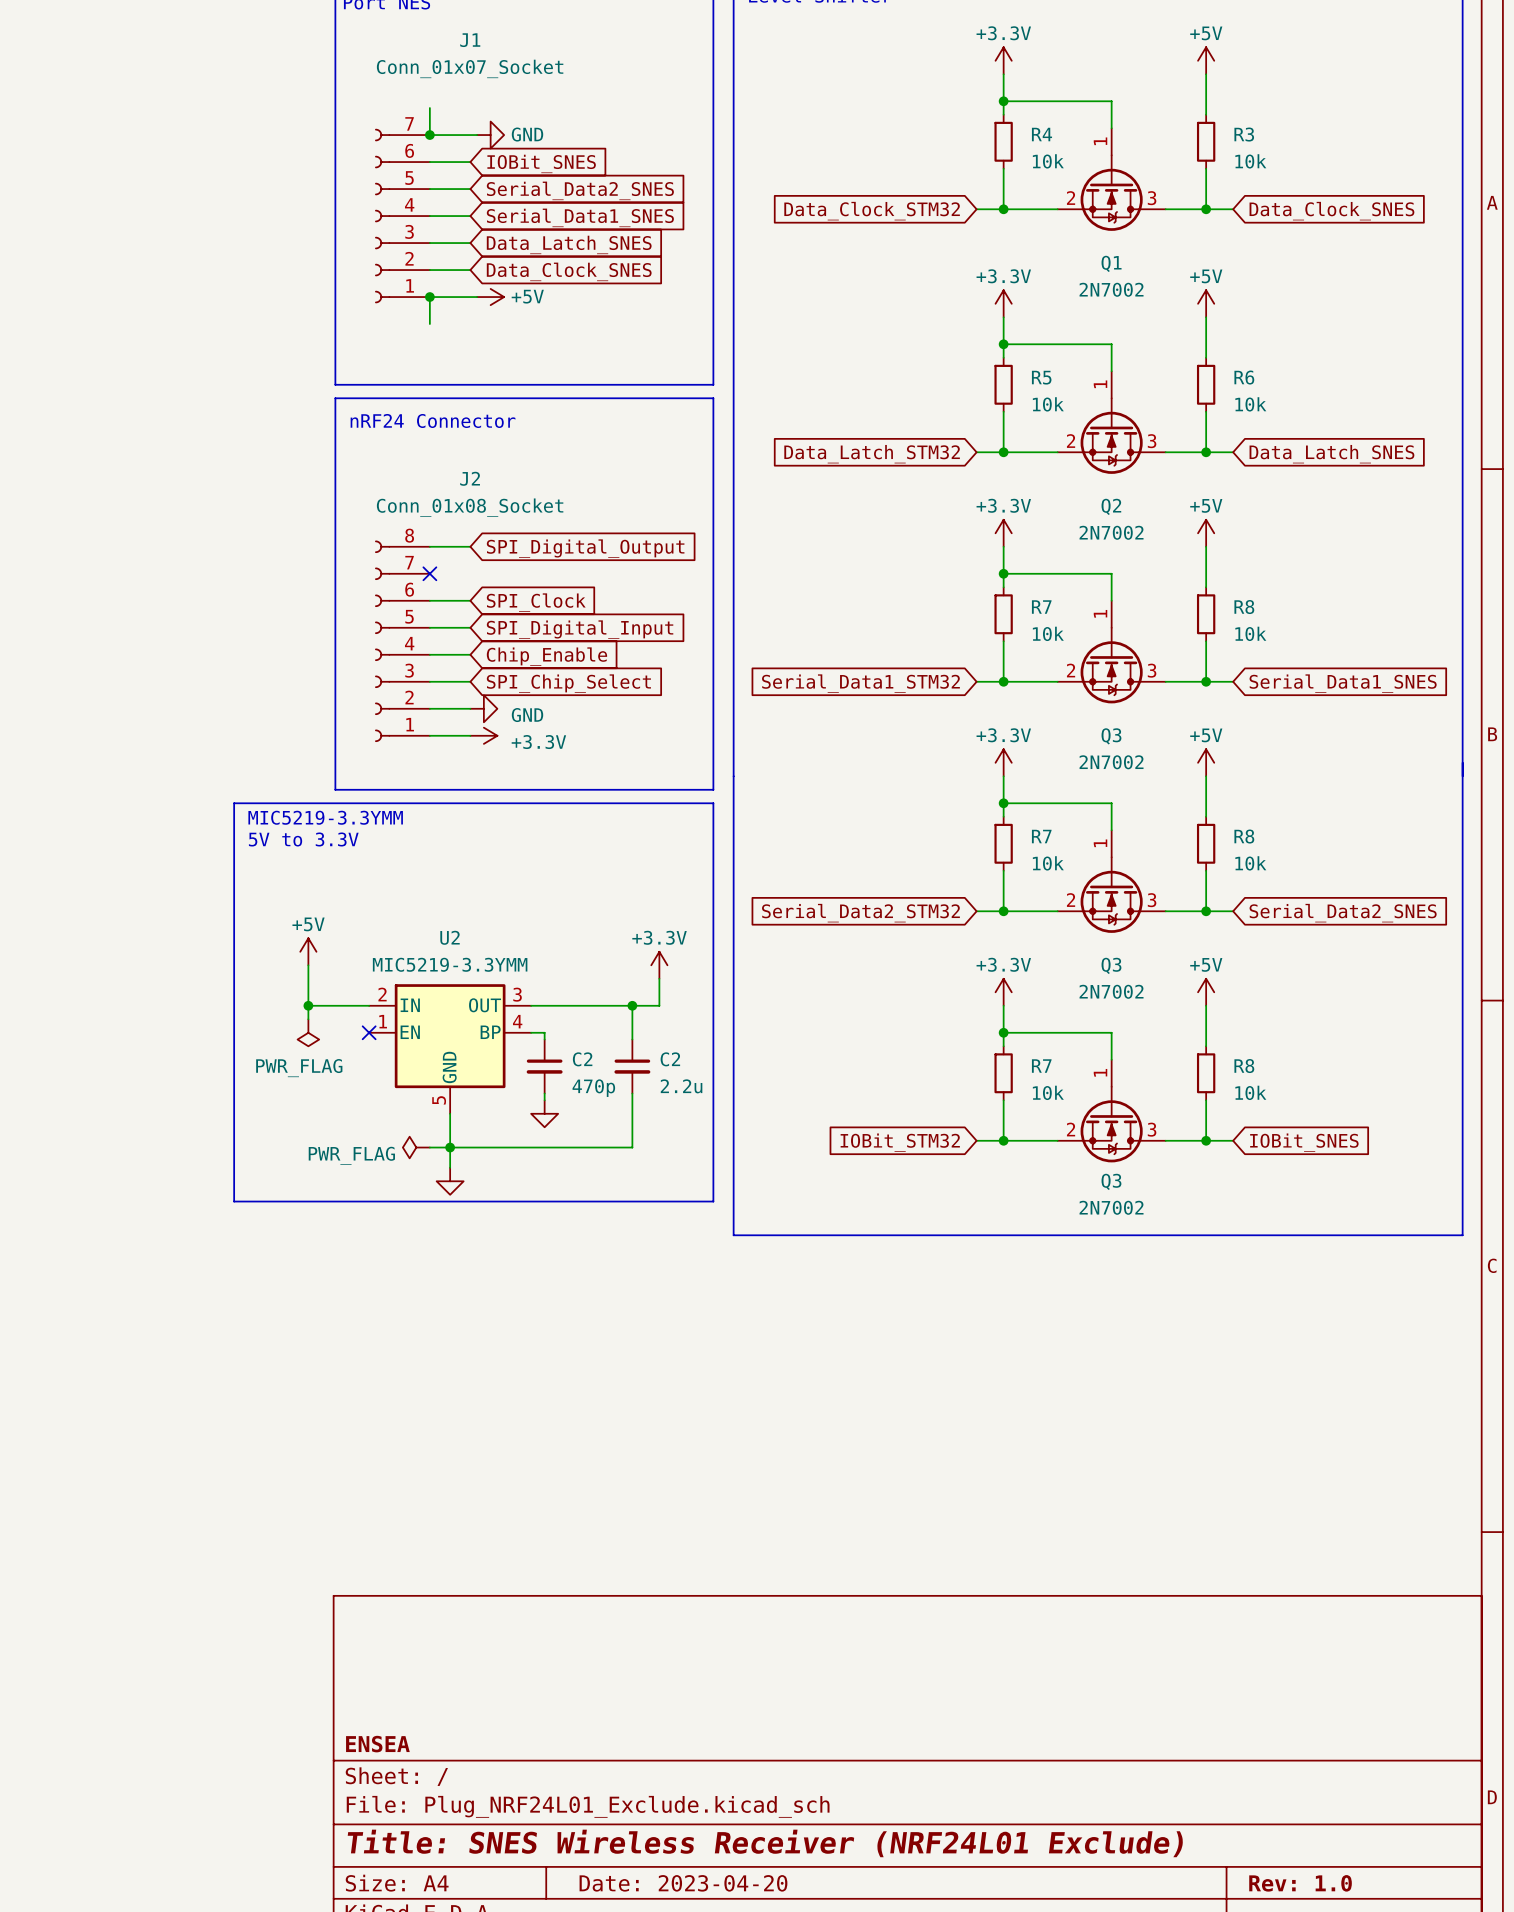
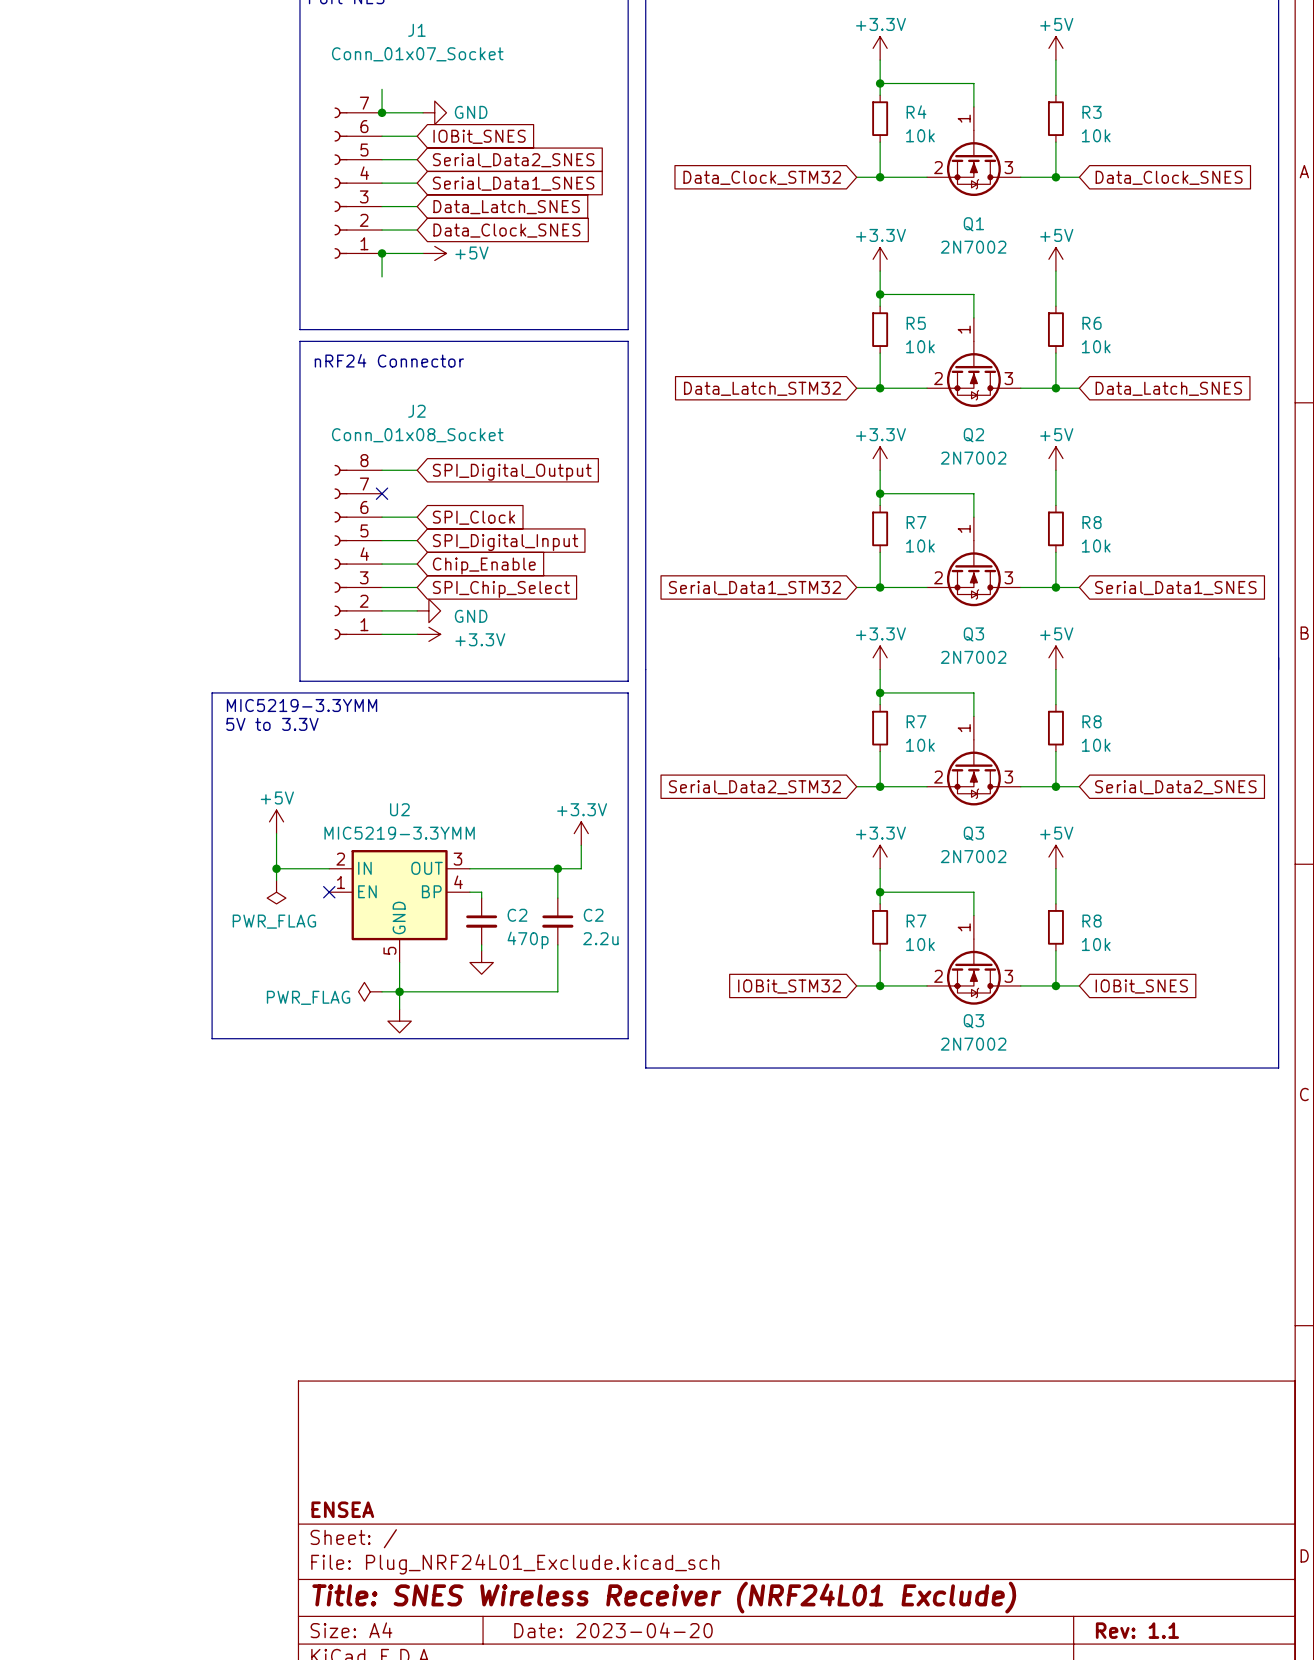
title block: Rev: 1.0 (1300, 1883) -> Rev: 1.1 (1137, 1630)

